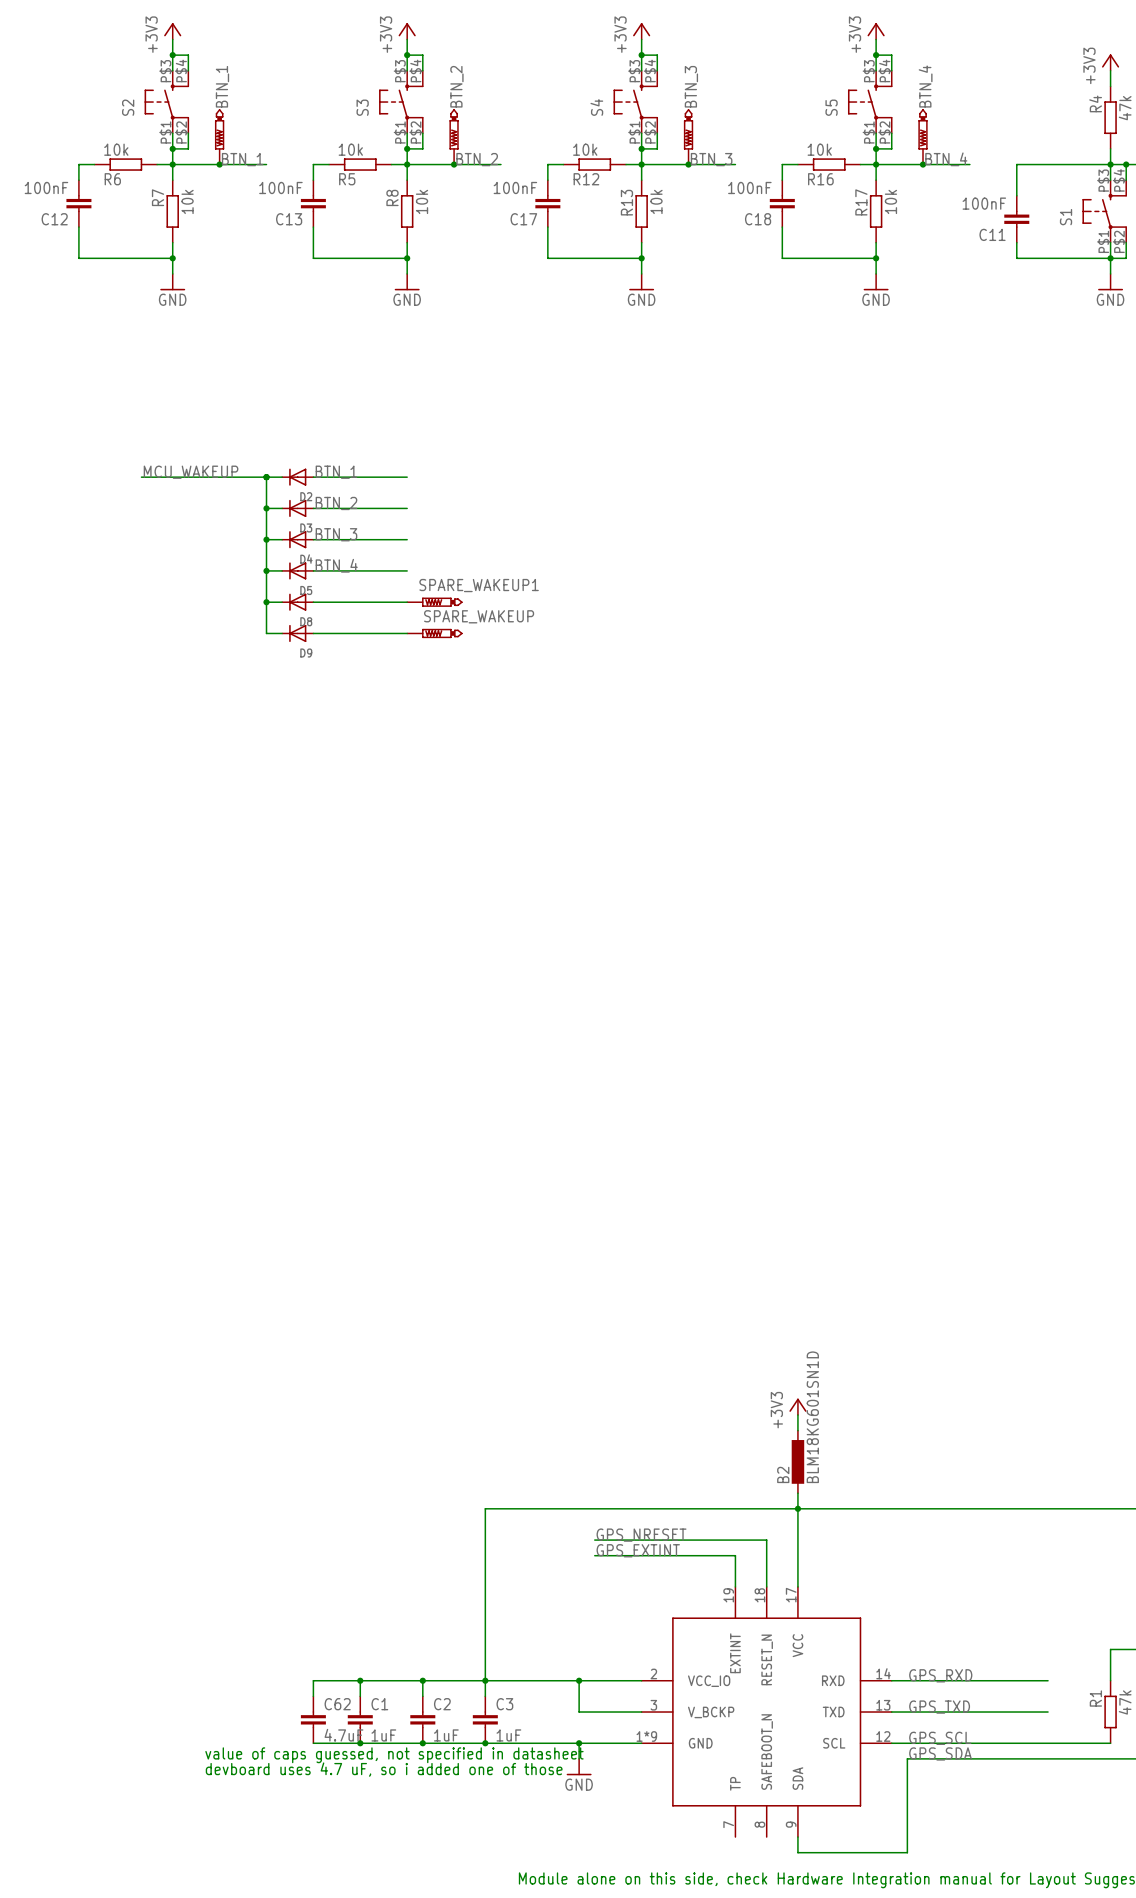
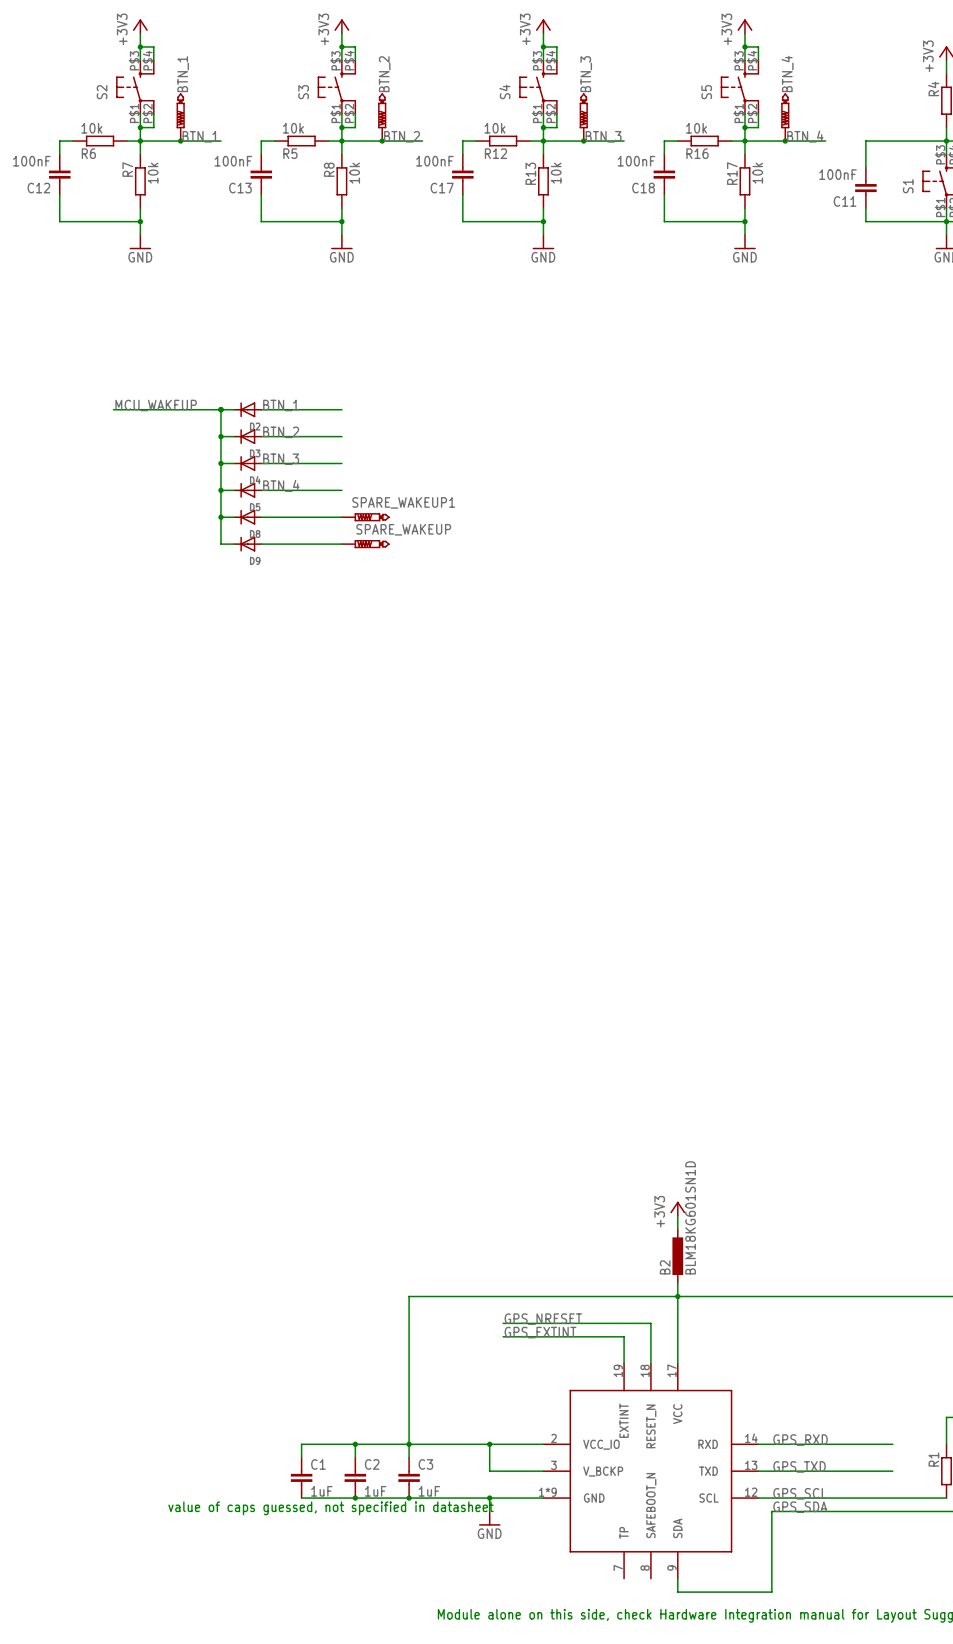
wire: (360, 1680) (313, 1680) (313, 1696) -> none
junction: (360, 1680) -> none
C62: 4.7uF (313, 1719) -> none
wire: (313, 1743) (360, 1743) -> none
junction: (360, 1743) -> none
text: devboard uses 4.7 uF, so i added one of those (384, 1769) -> none

